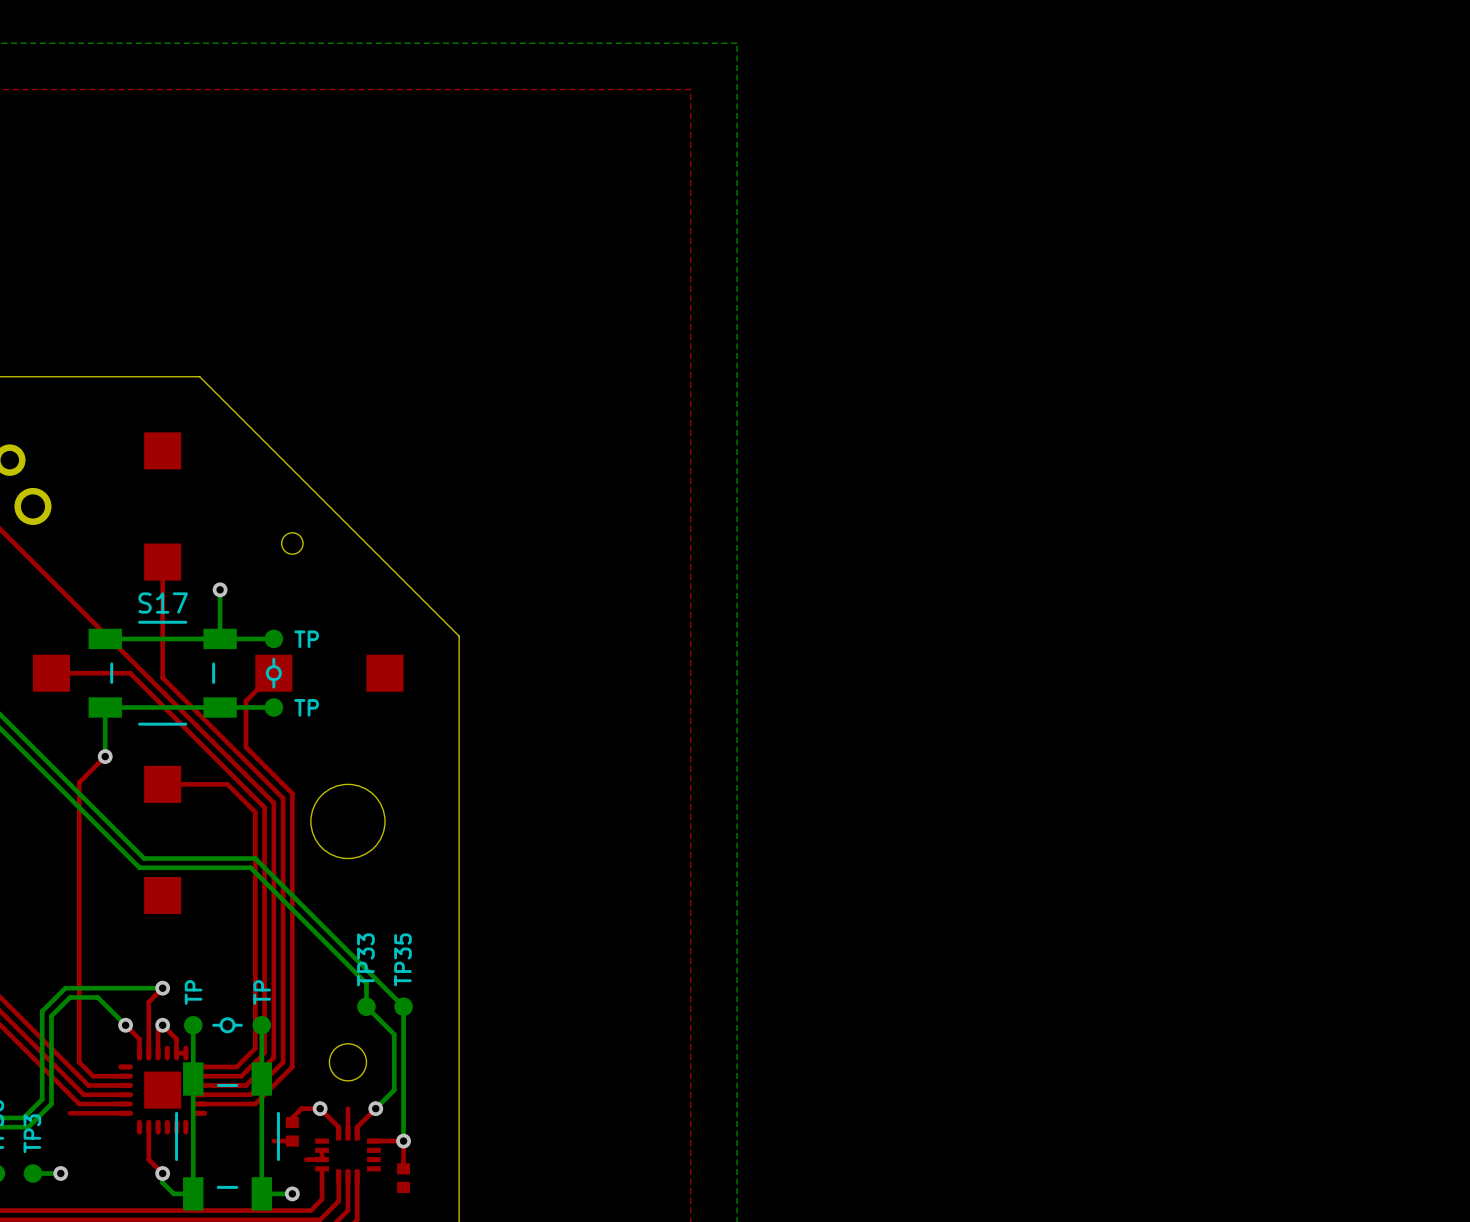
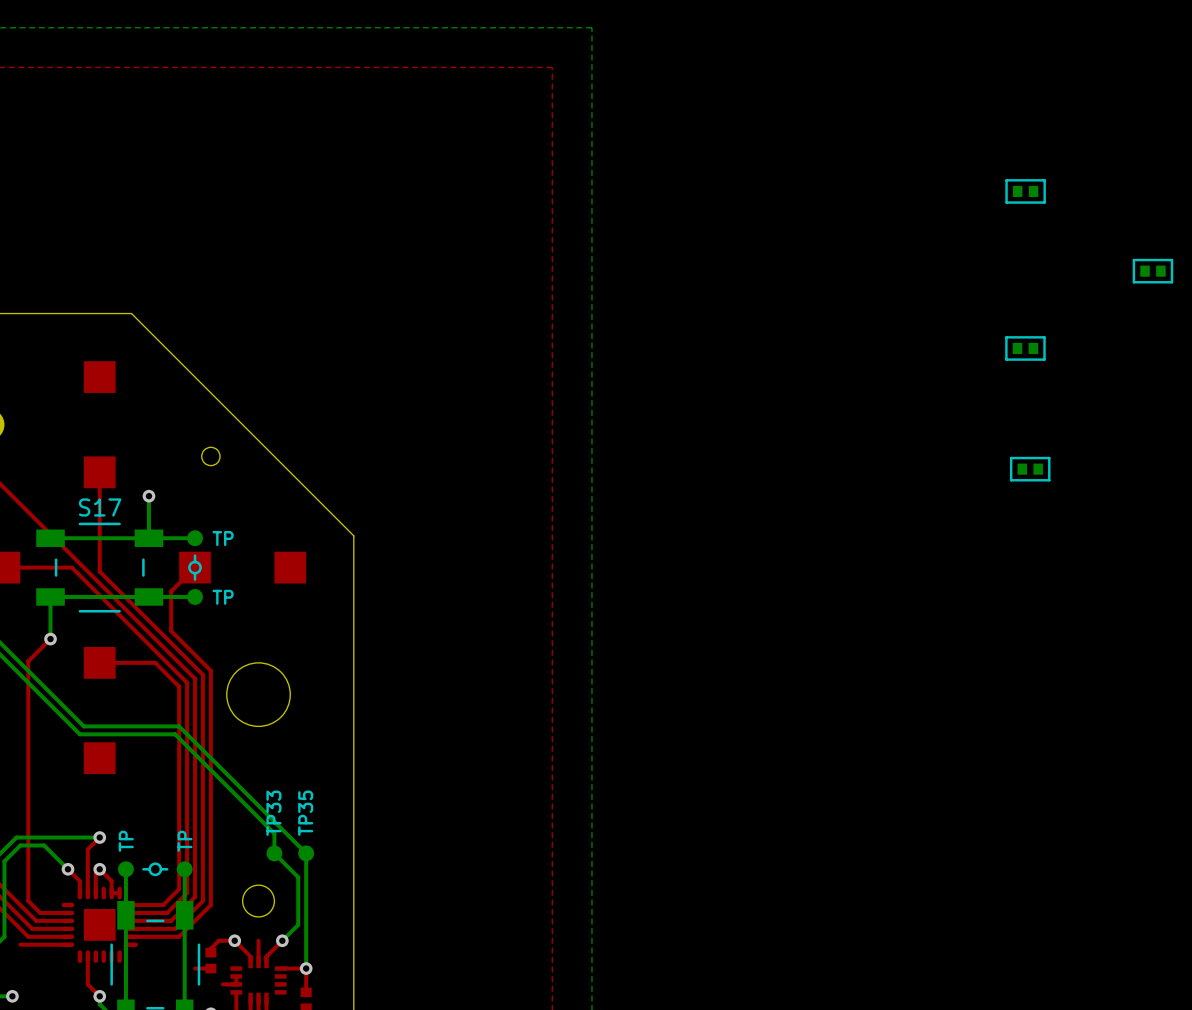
part: none -> (1025, 191)
part: none -> (1152, 271)
part: none -> (1025, 348)
part: none -> (1030, 469)

